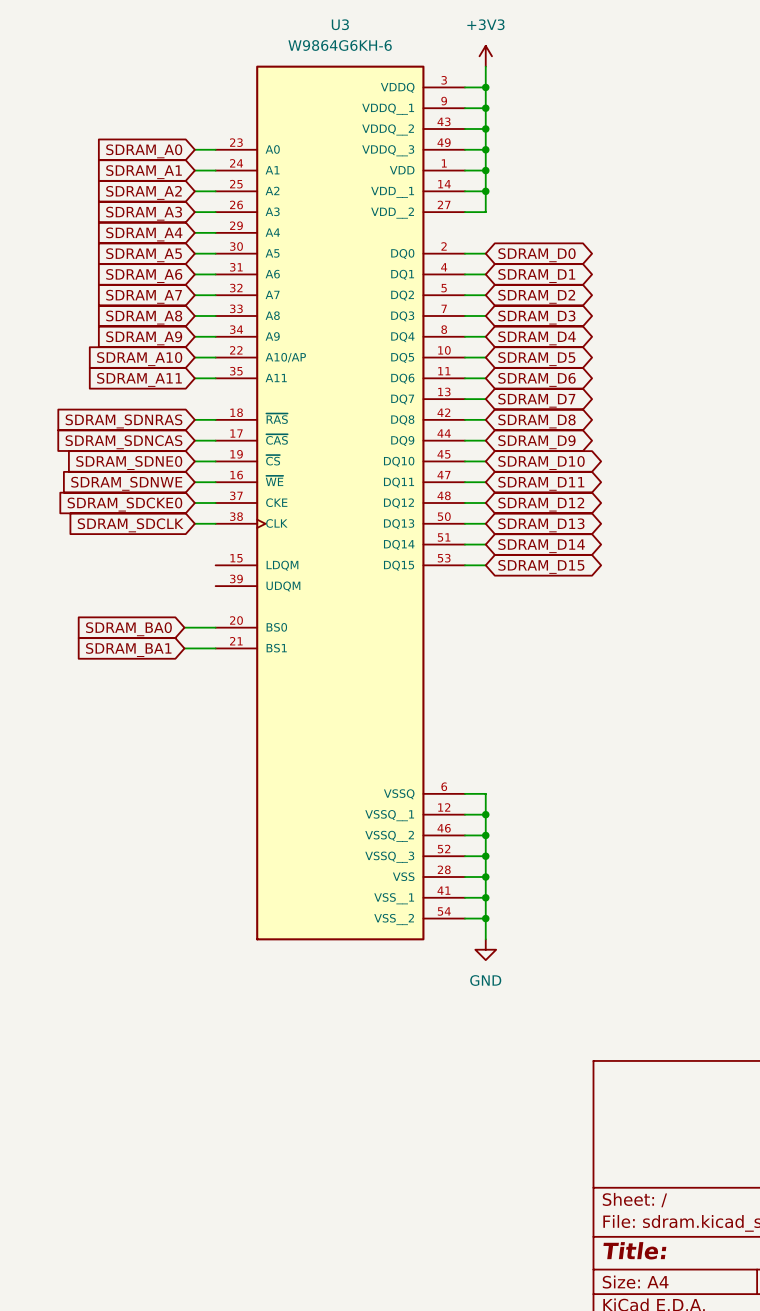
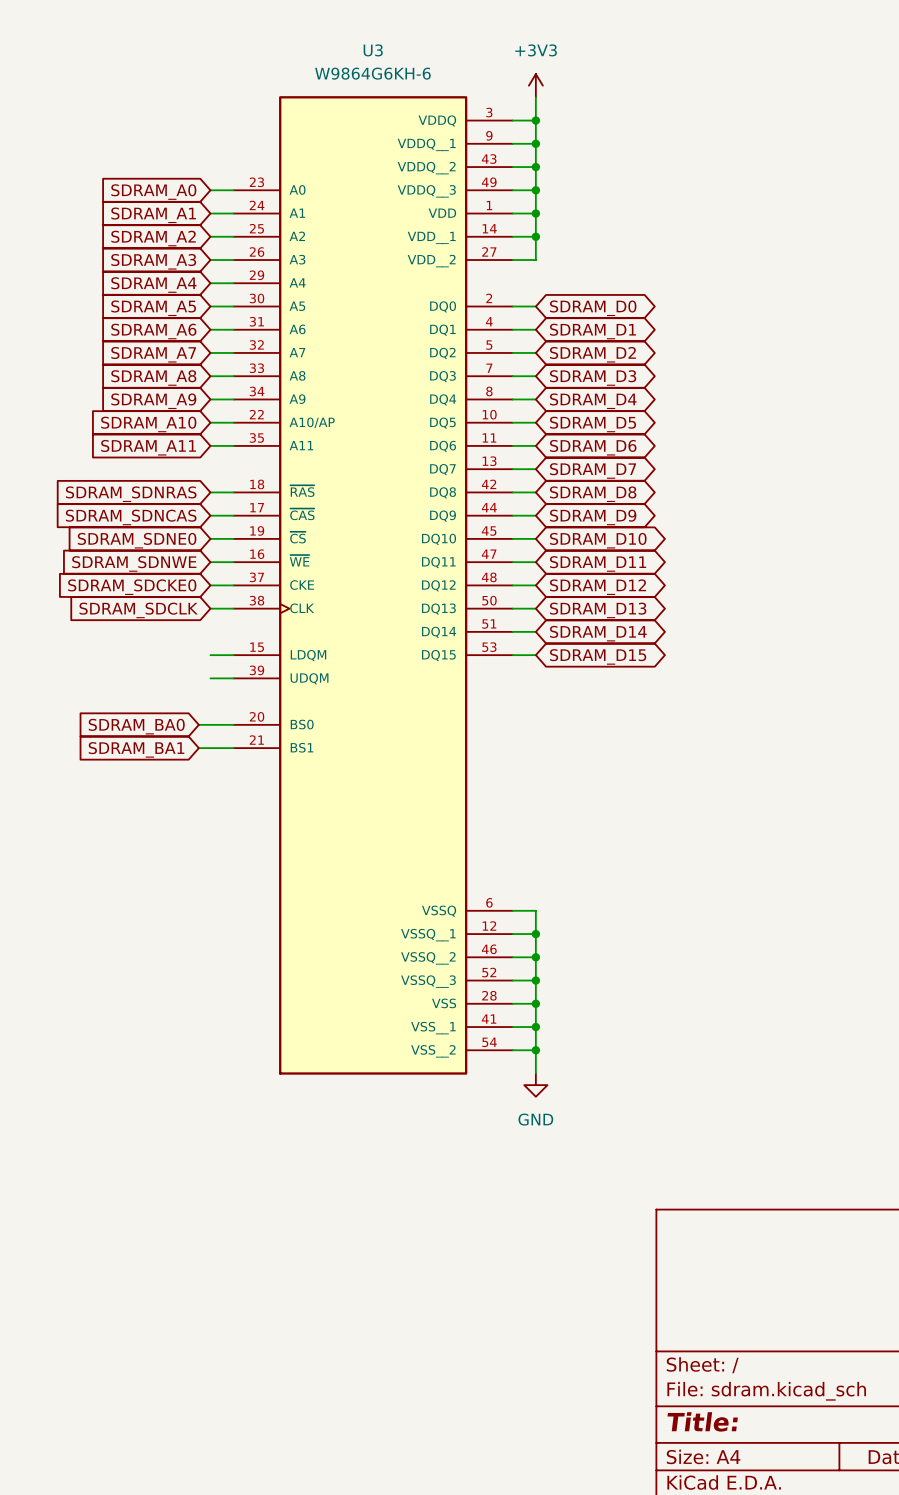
wire: none -> (210, 655) (233, 655)
wire: none -> (210, 678) (233, 678)

